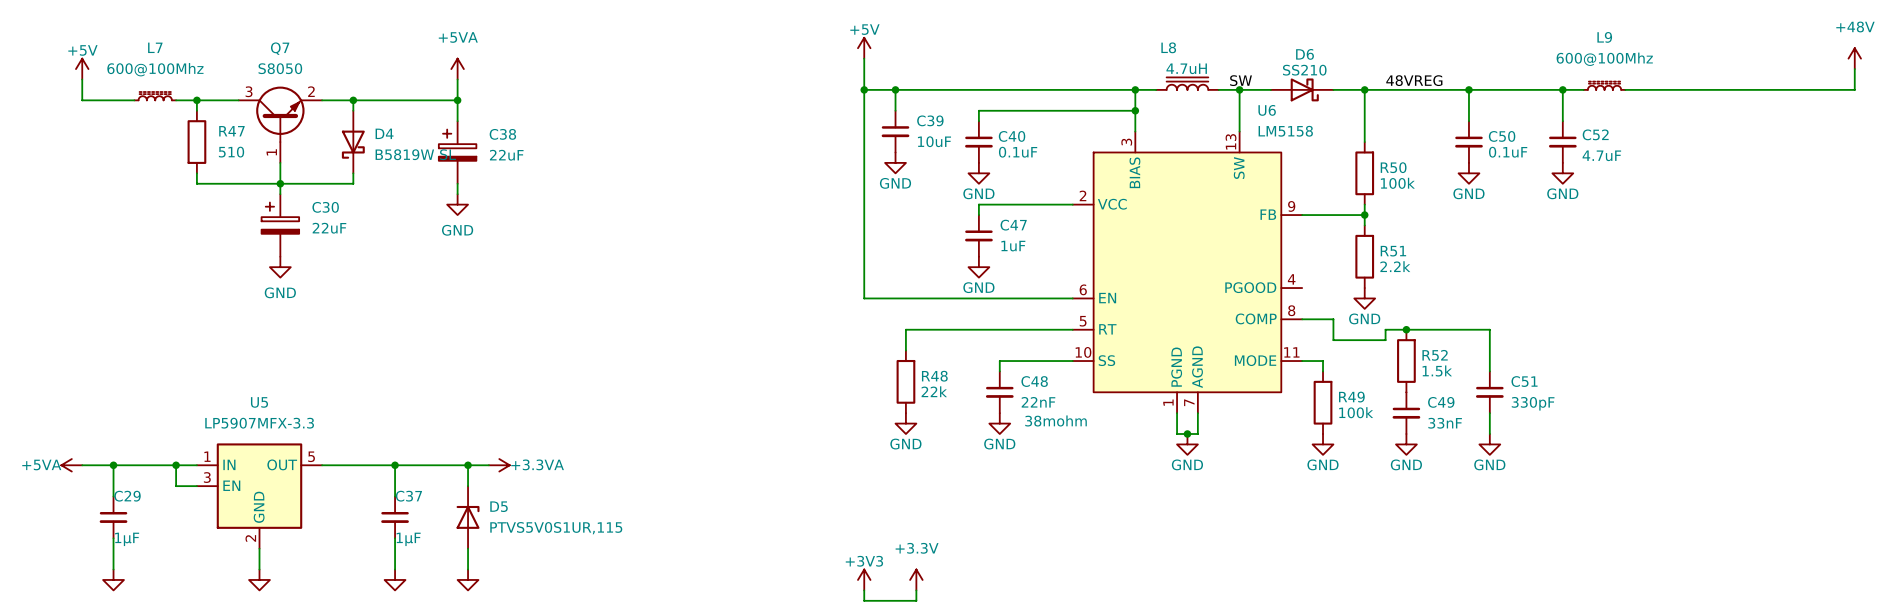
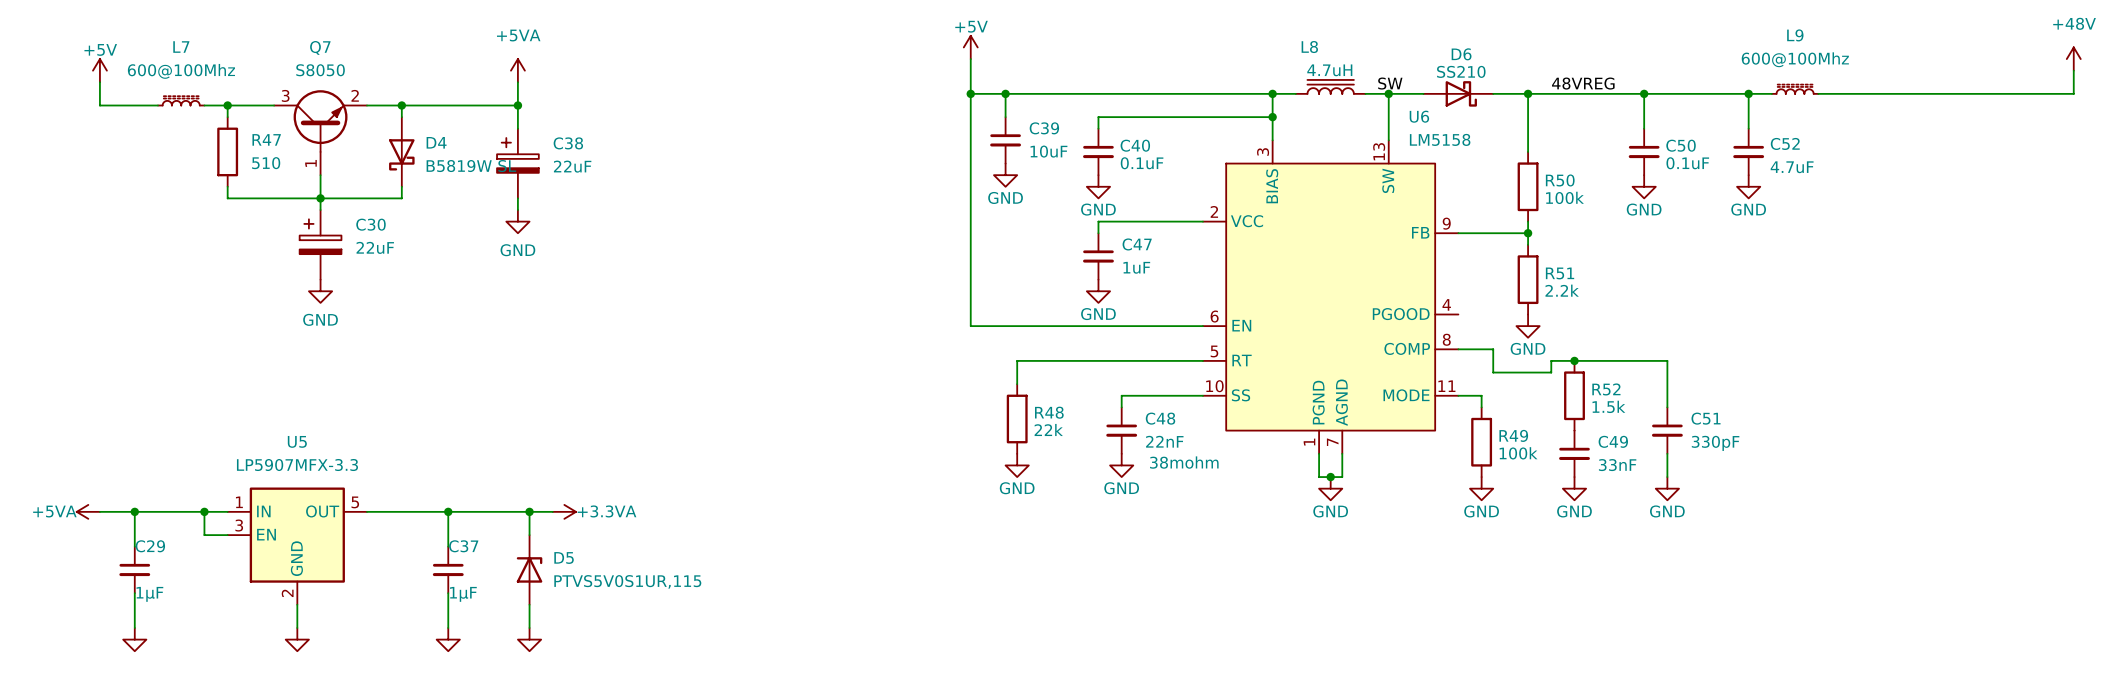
power symbol: +3V3 (864, 579) -> none
power symbol: +3.3V (916, 579) -> none
wire: (864, 590) (864, 600) (916, 600) (916, 590) -> none

